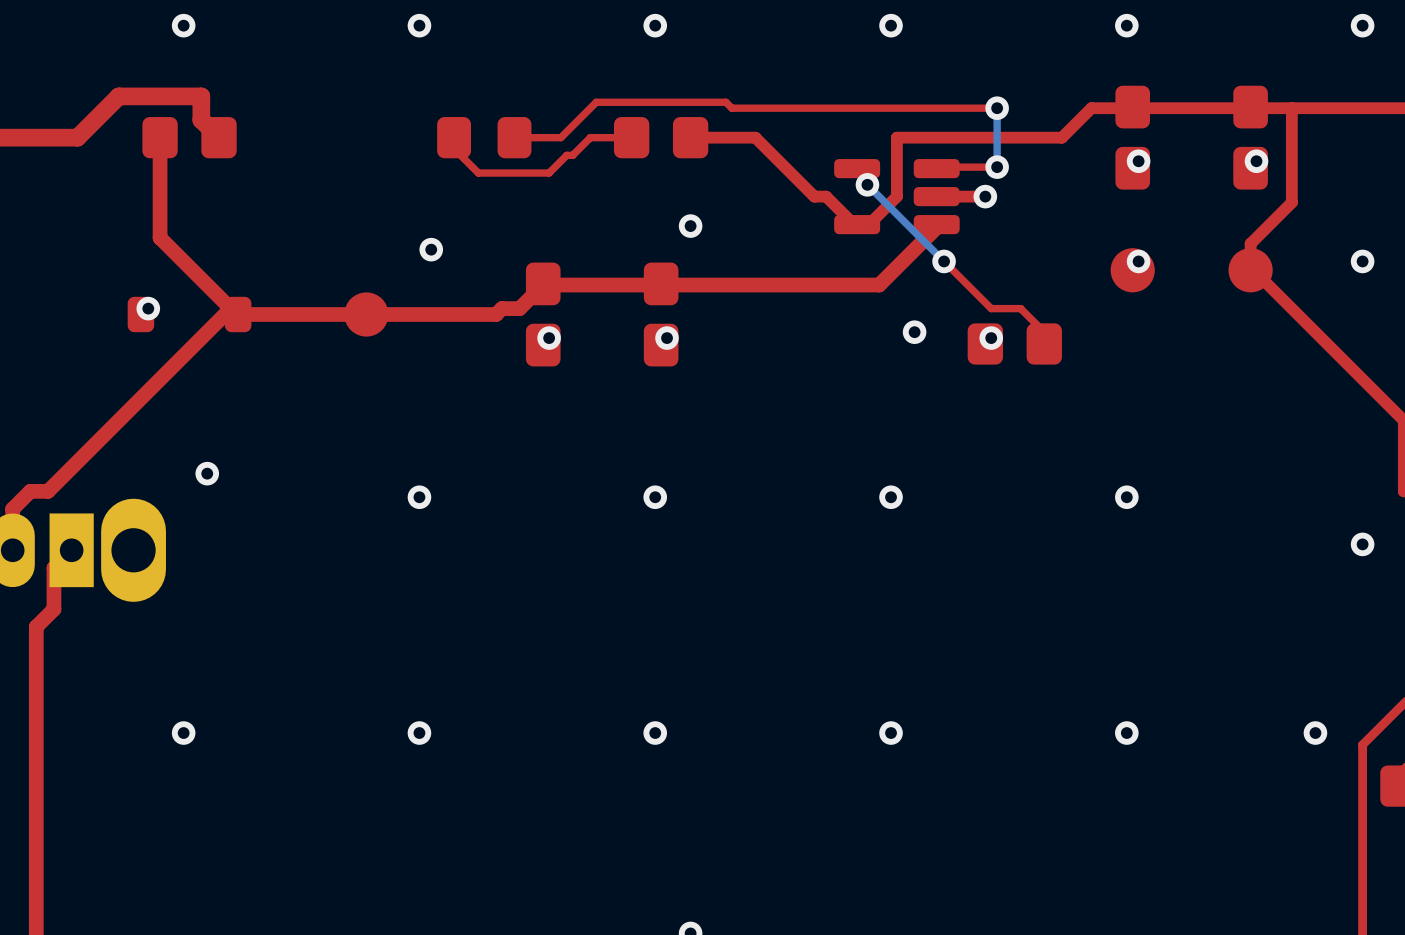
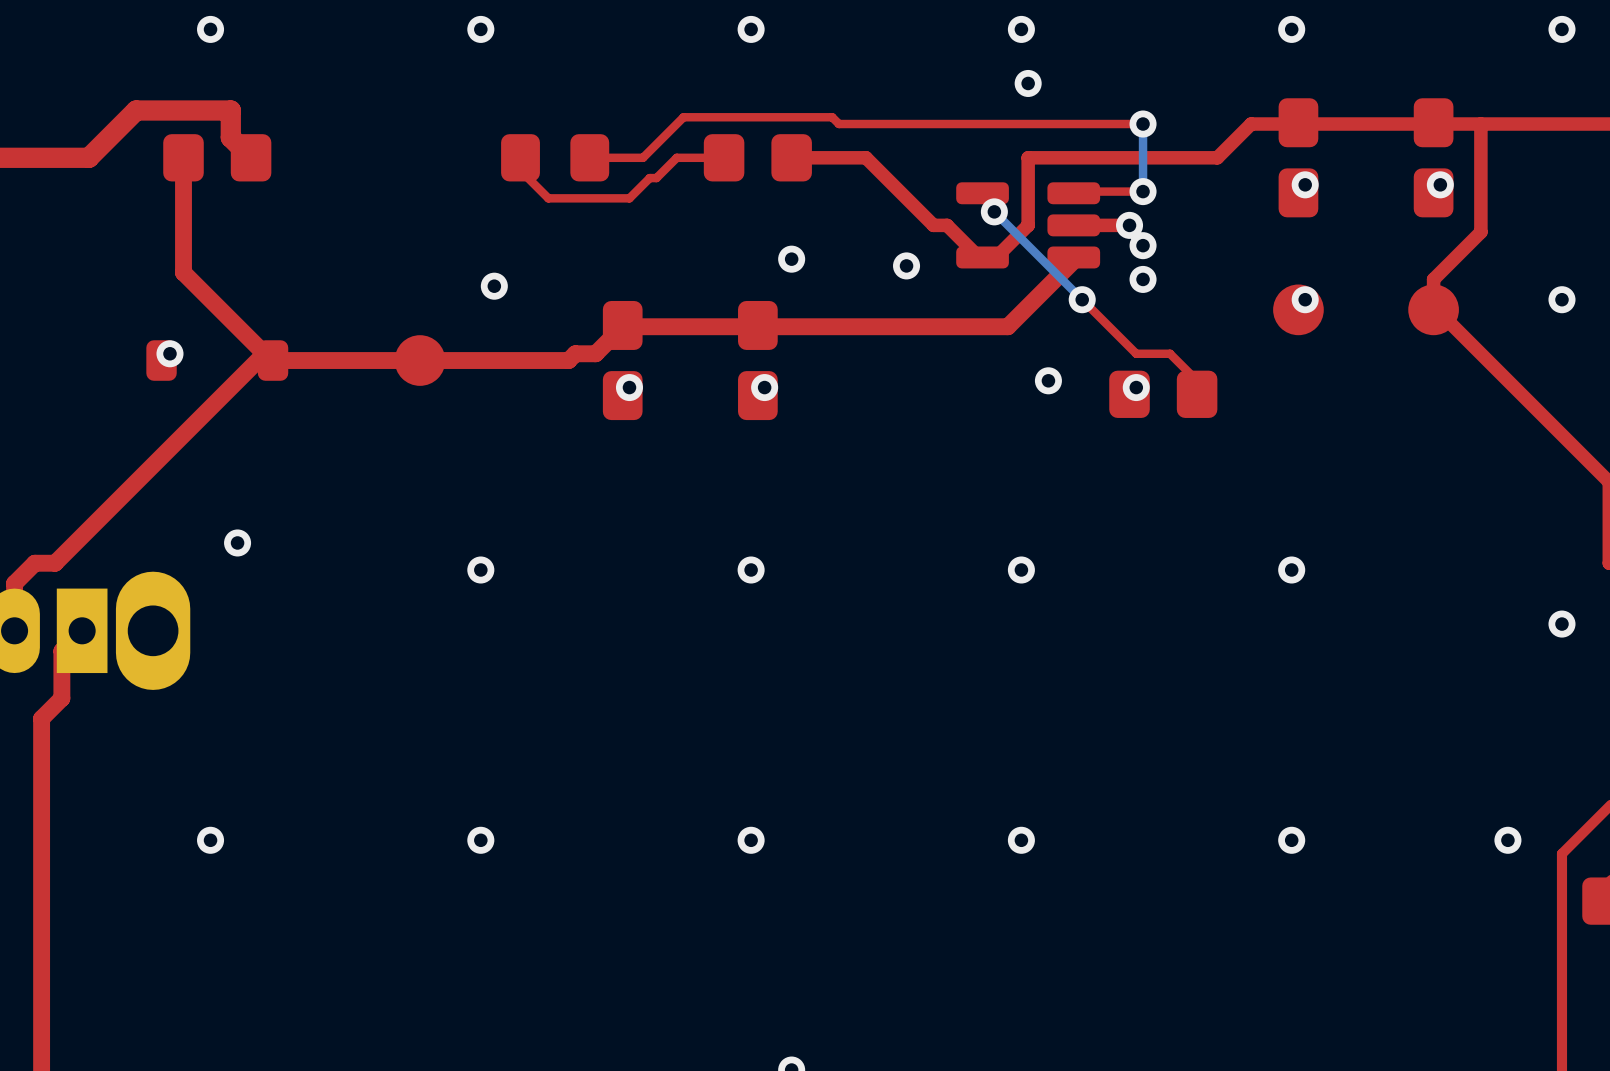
via: none -> (1028, 83)
via: none -> (1143, 245)
via: none -> (906, 265)
via: none -> (1143, 279)

